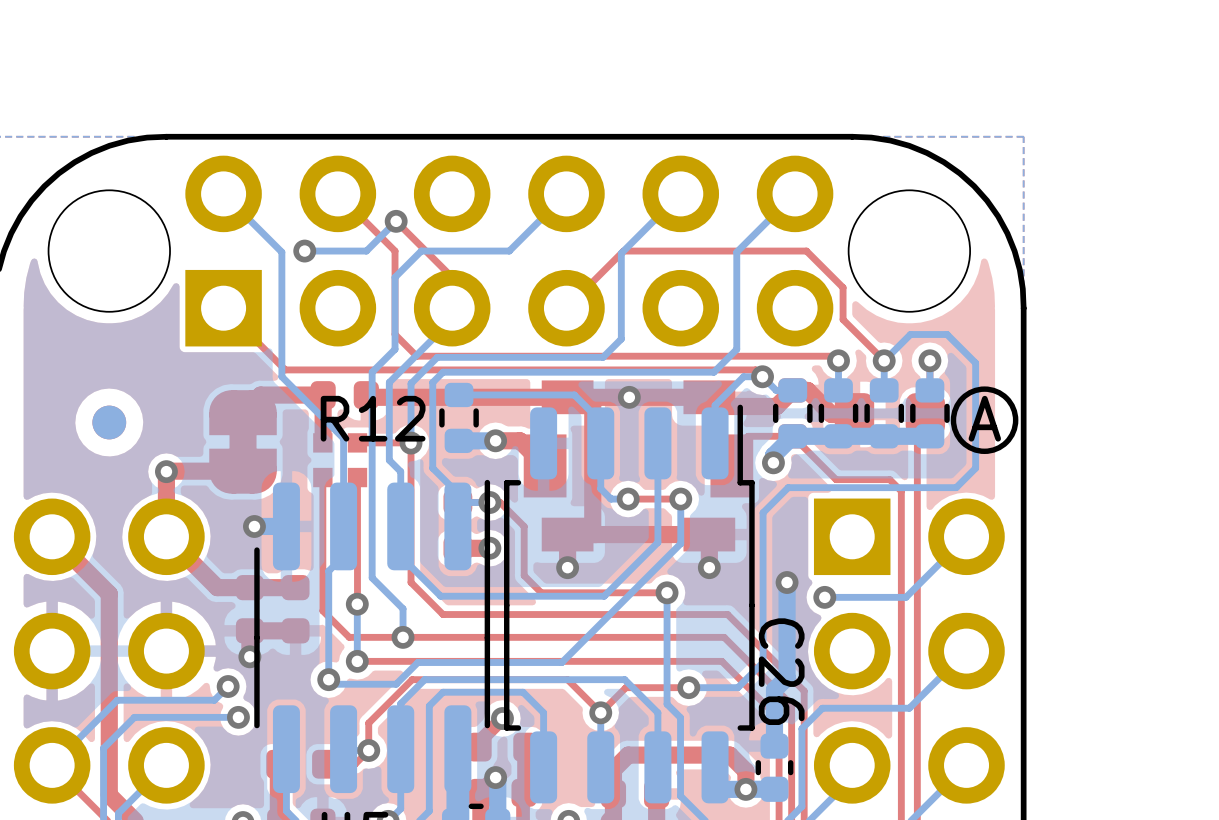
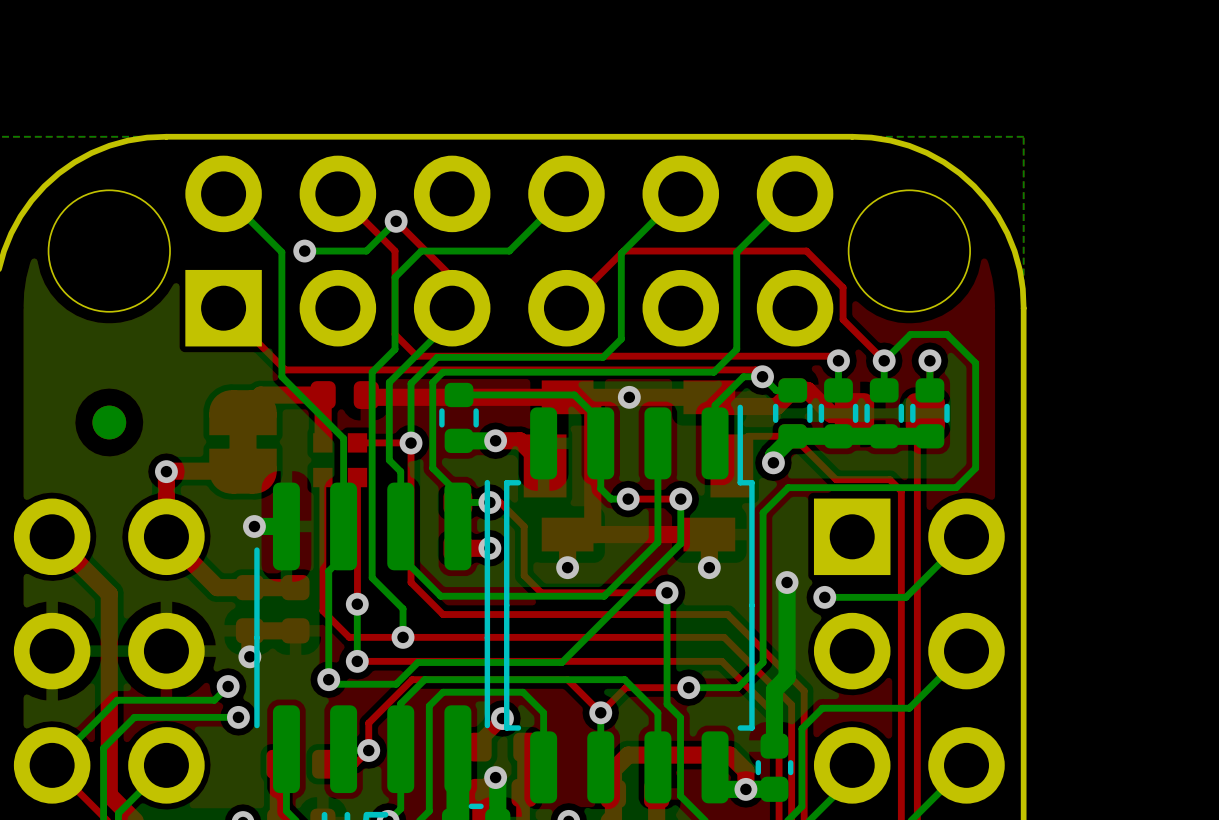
drawing: [950, 386, 1019, 455] -> none
R12 name: R12 (373, 418) -> none
text: A (984, 418) -> none
C26 name: C26 (781, 671) -> none

